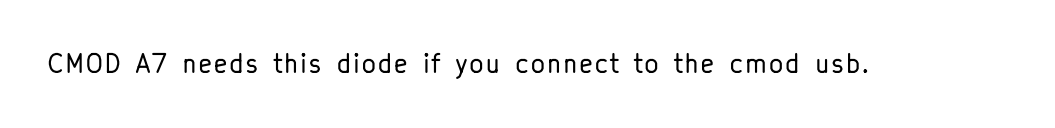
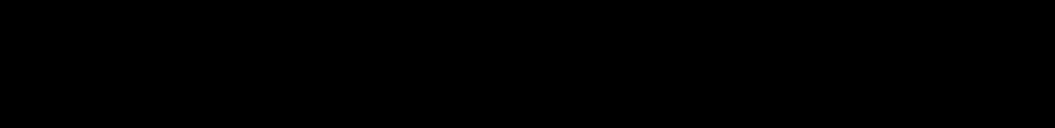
text: CMOD A7 needs this diode if you connect to the cmod usb. (458, 65) -> none

